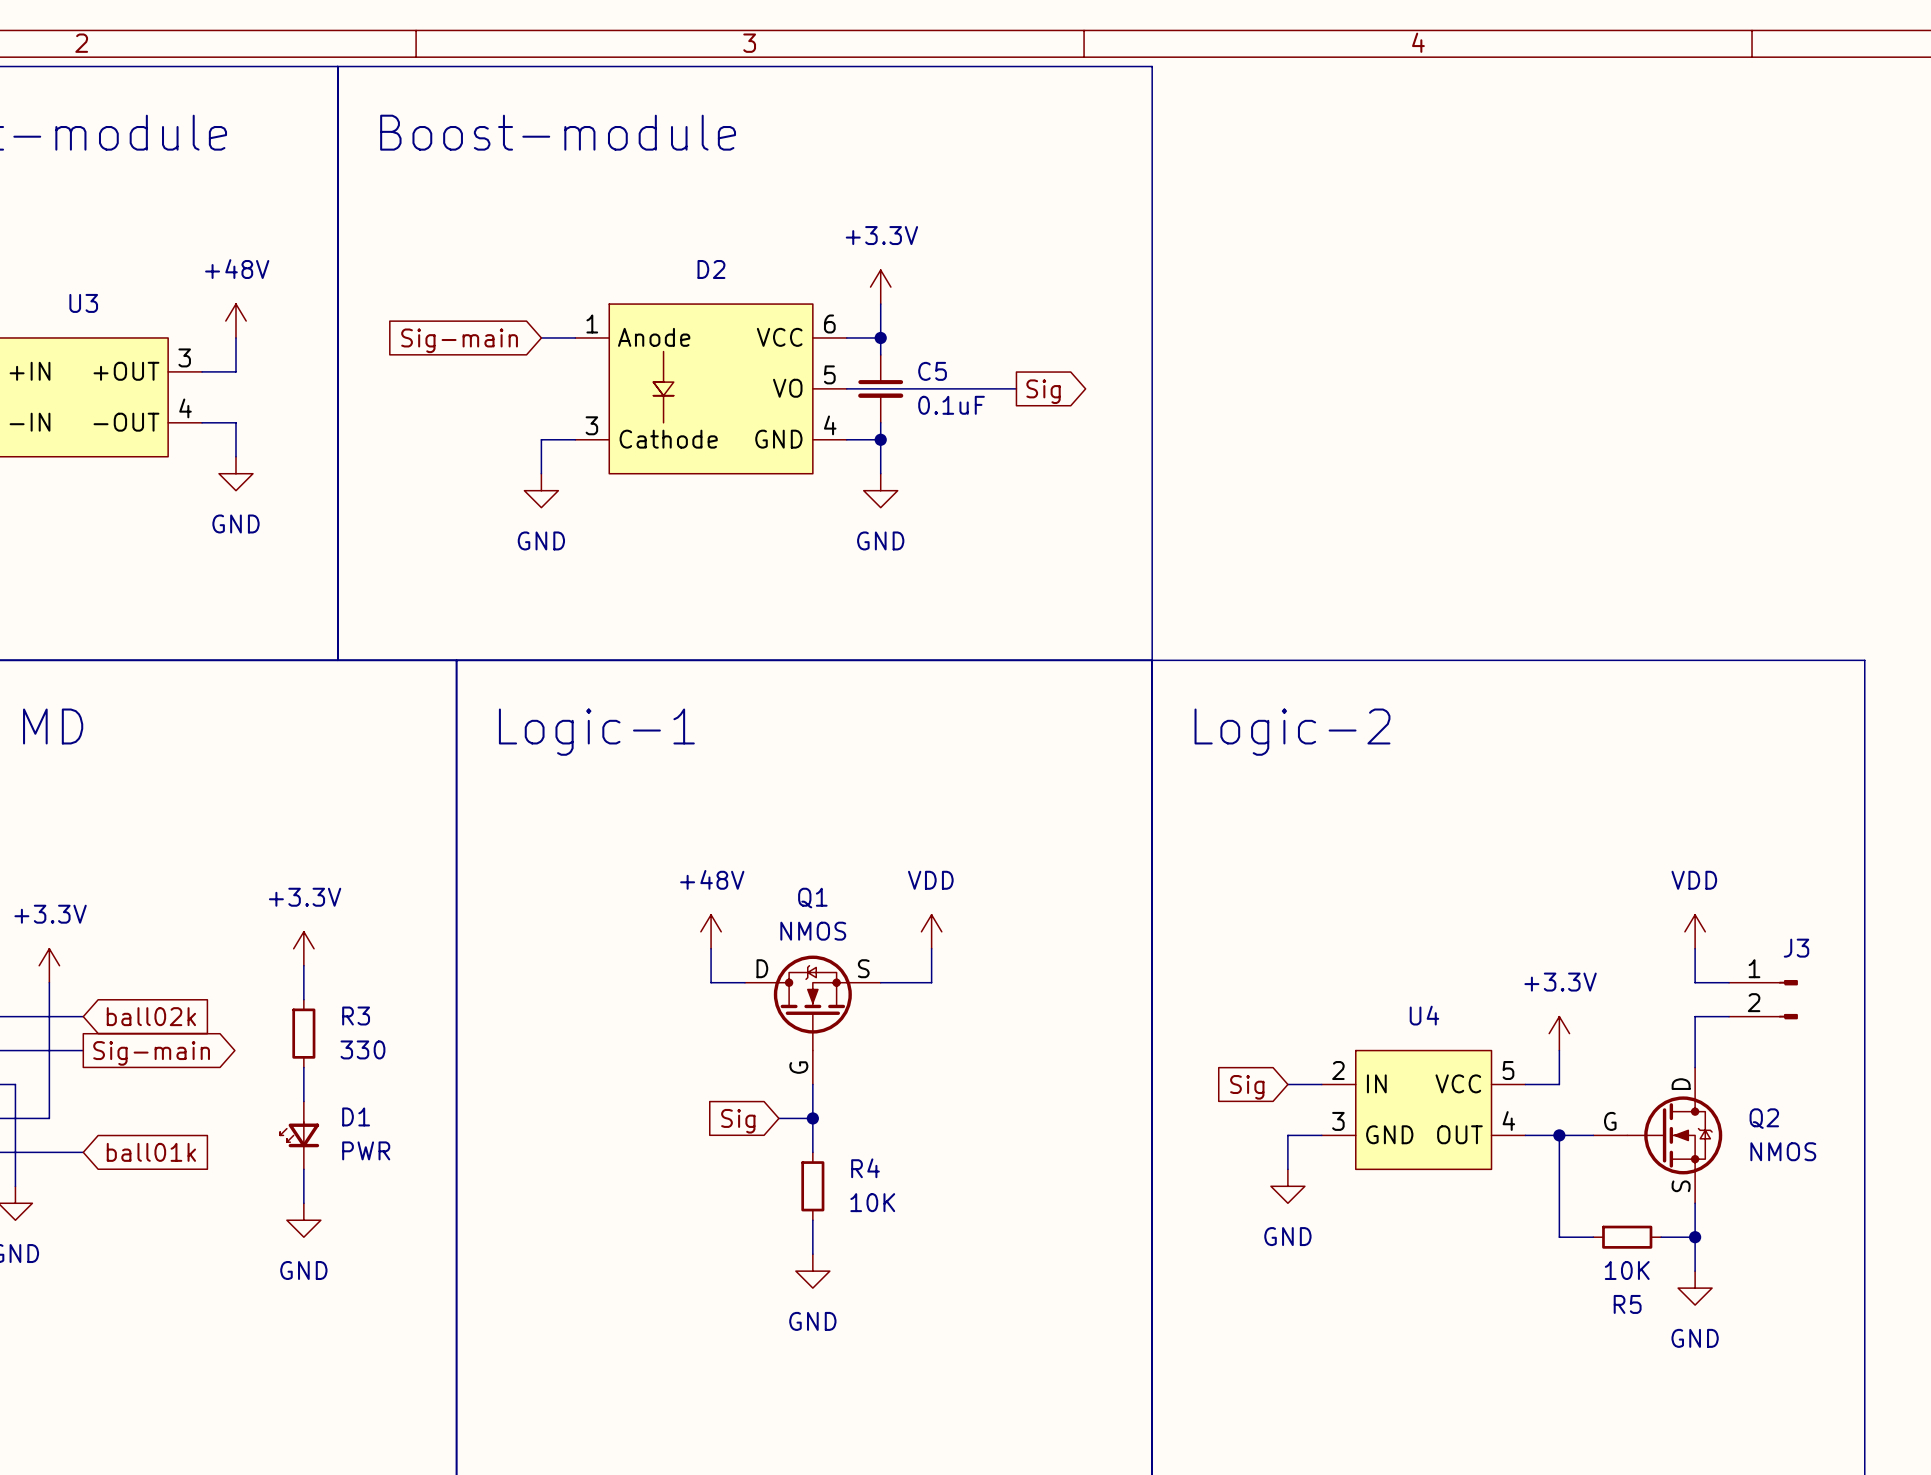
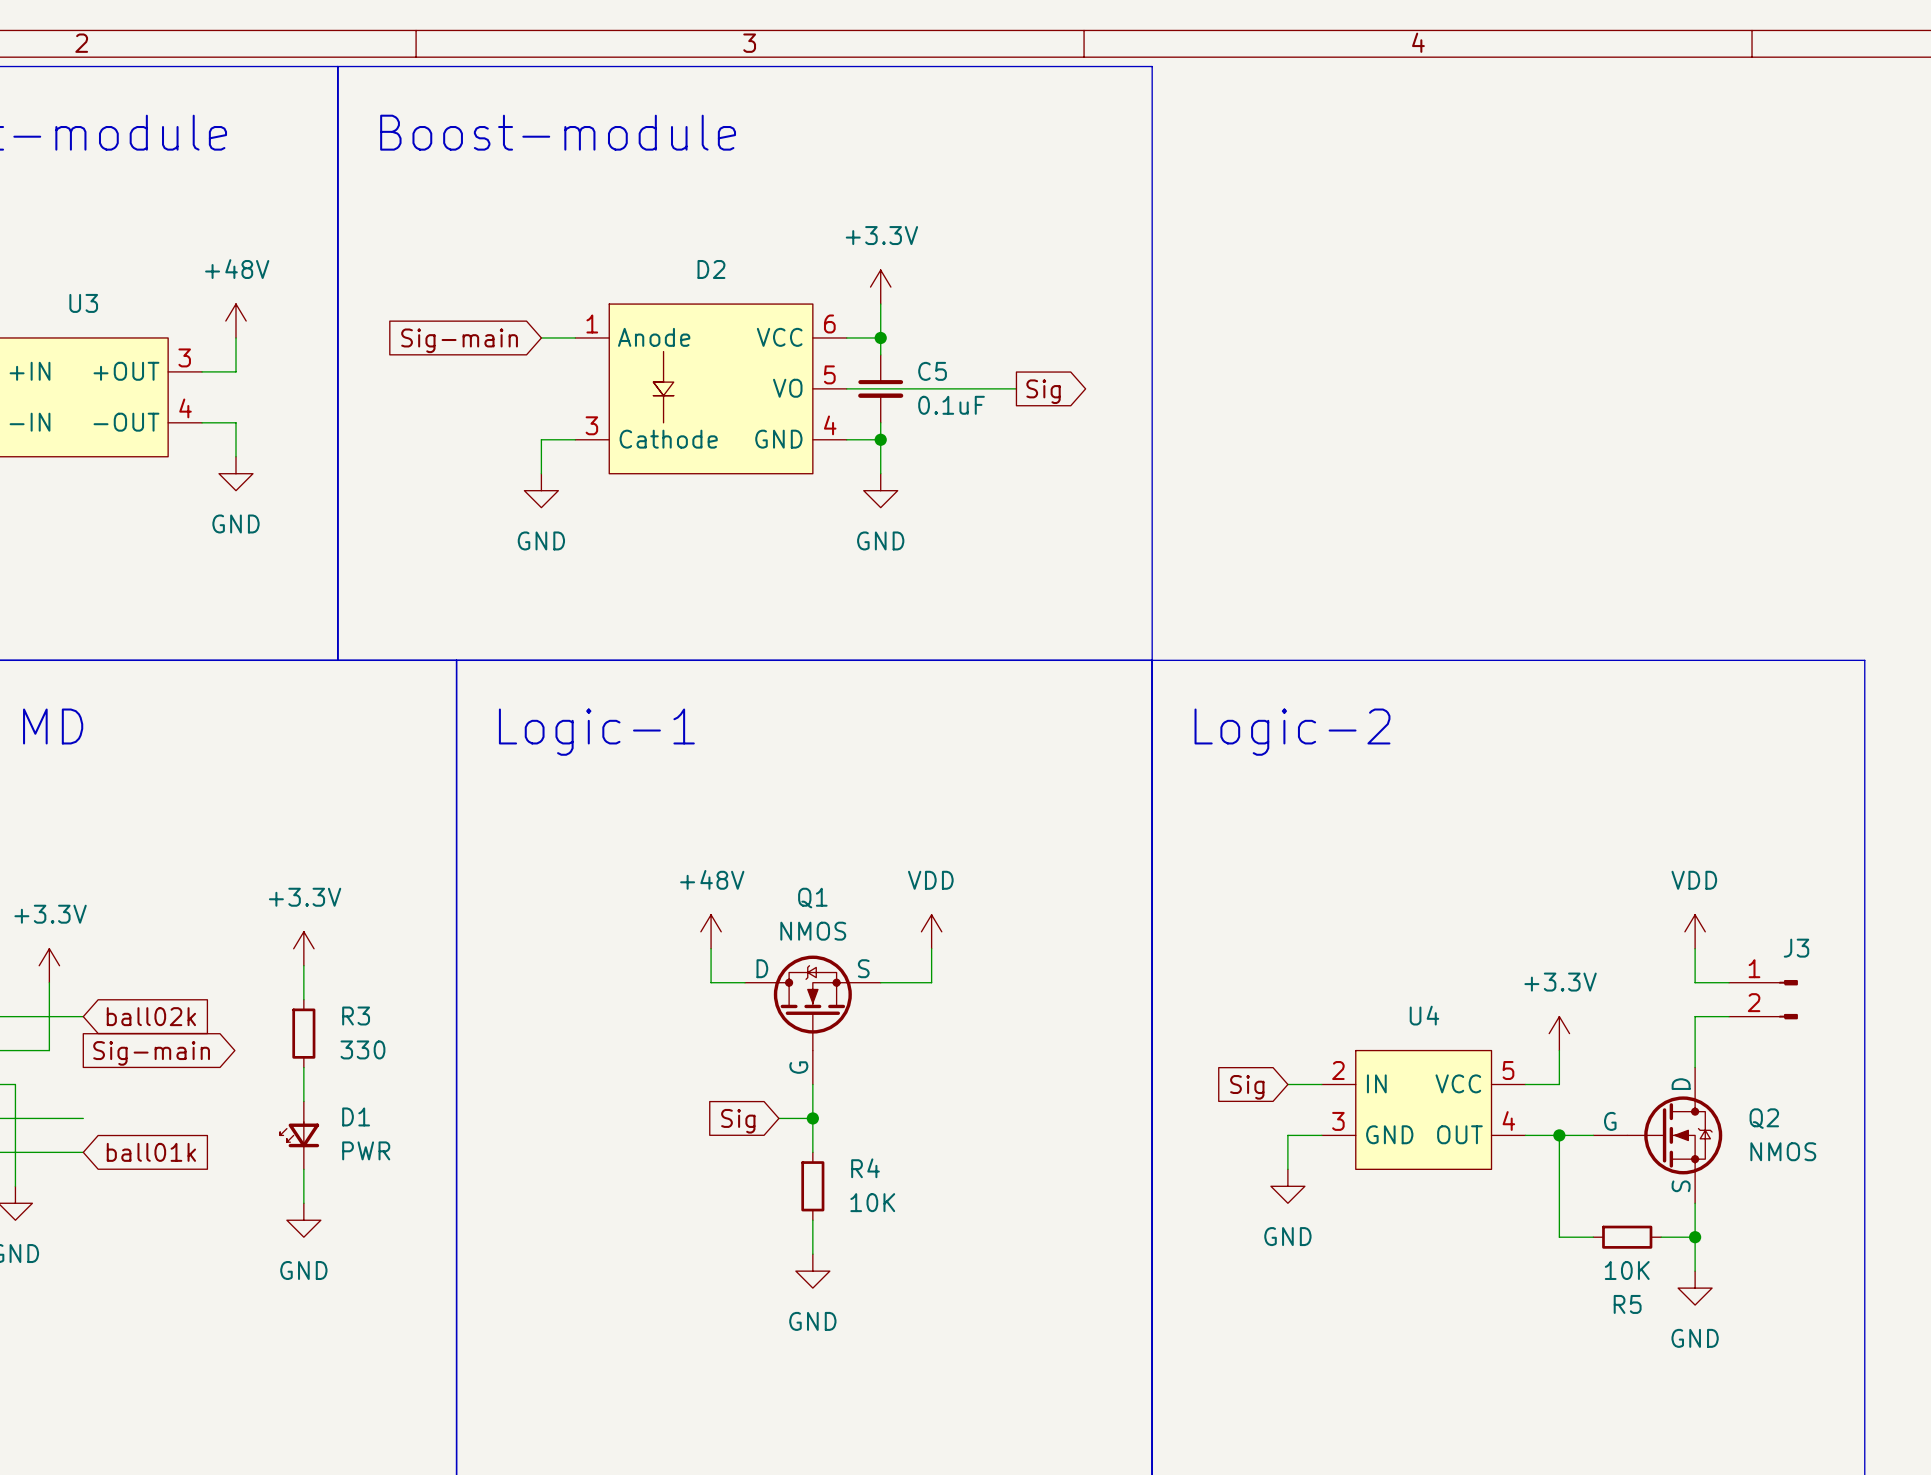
wire: (83, 1050) (49, 1050) (49, 1118) -> (83, 1118) (49, 1118)

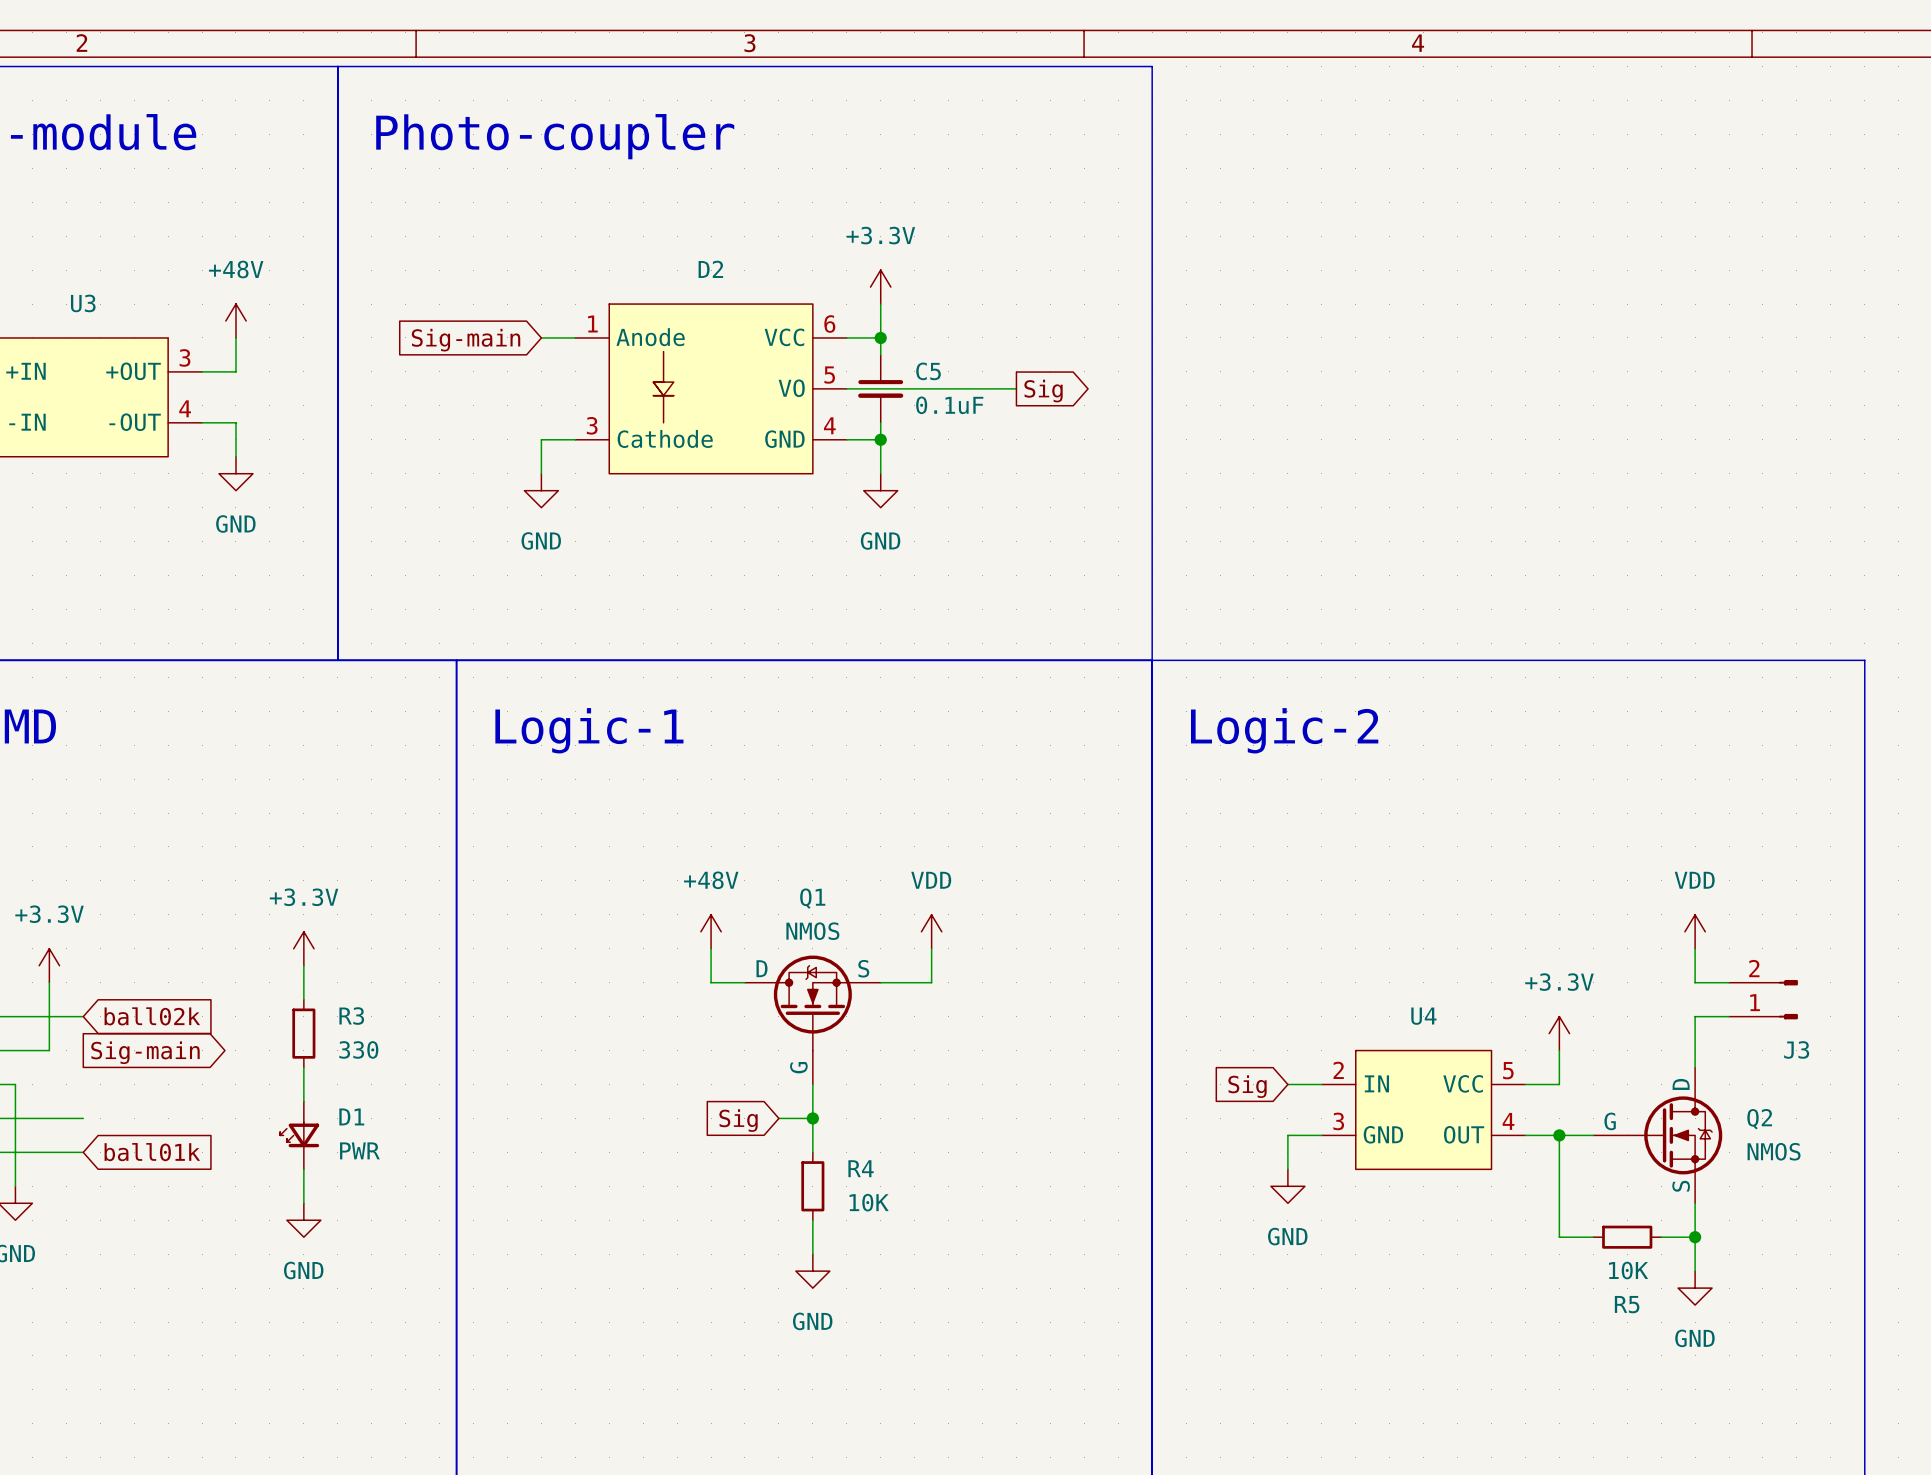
text: Boost-module (558, 132) -> Photo-coupler (555, 136)
J3 flip: as is (1788, 999) -> up-down (1788, 999)

